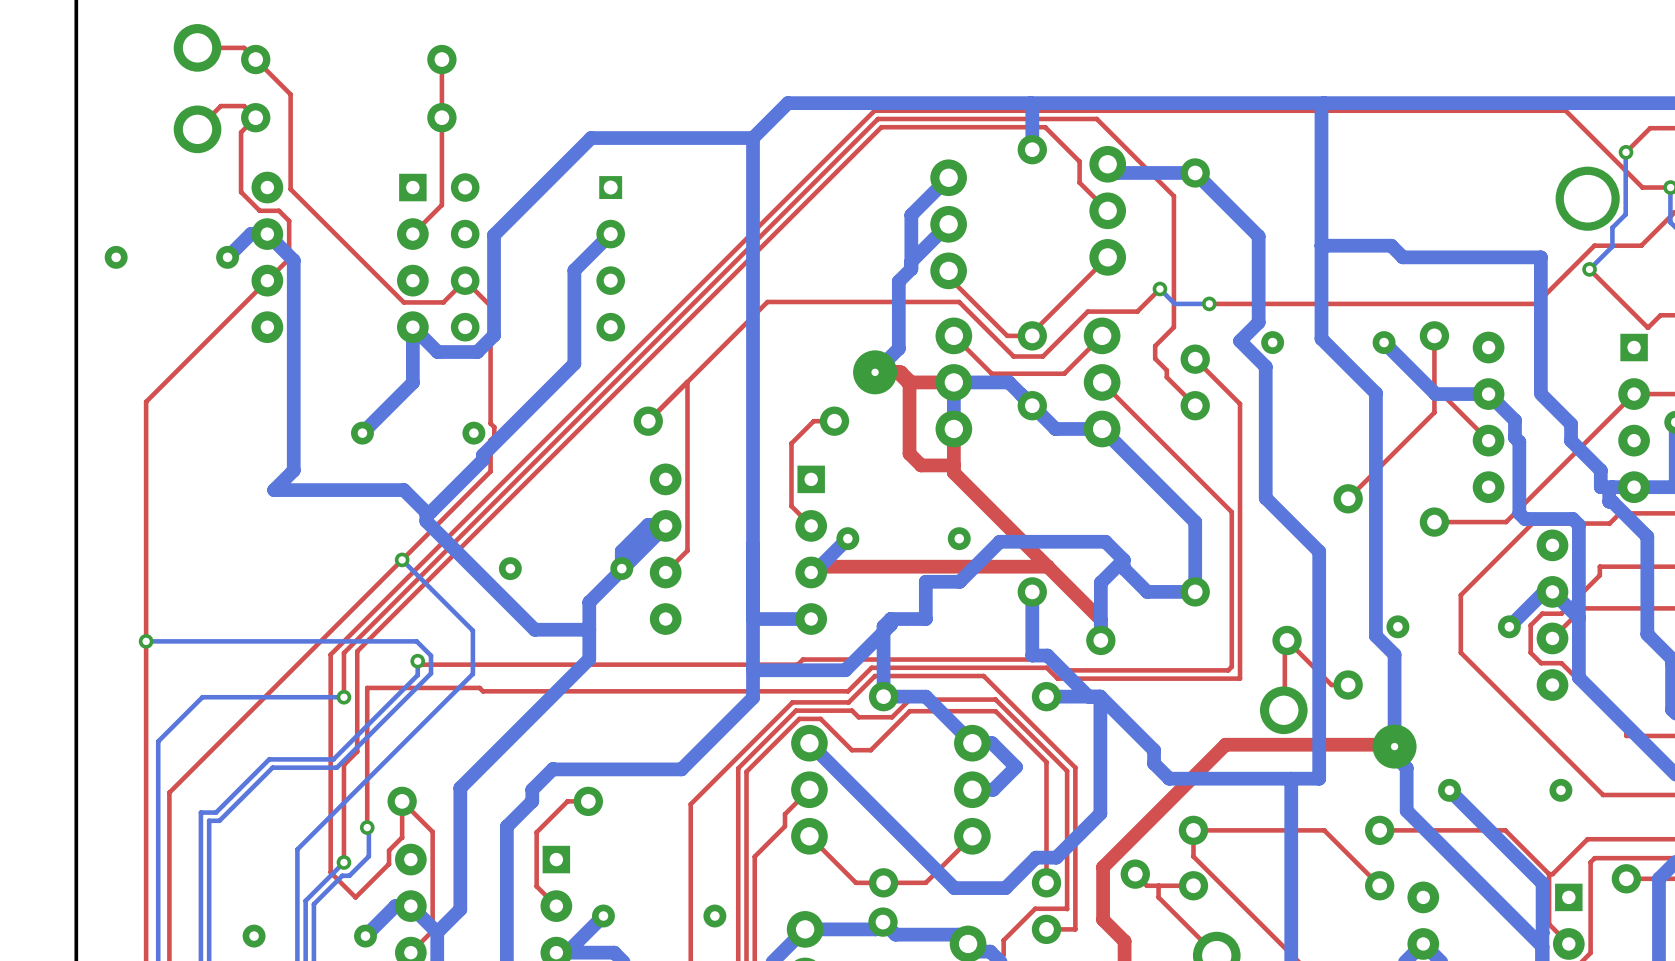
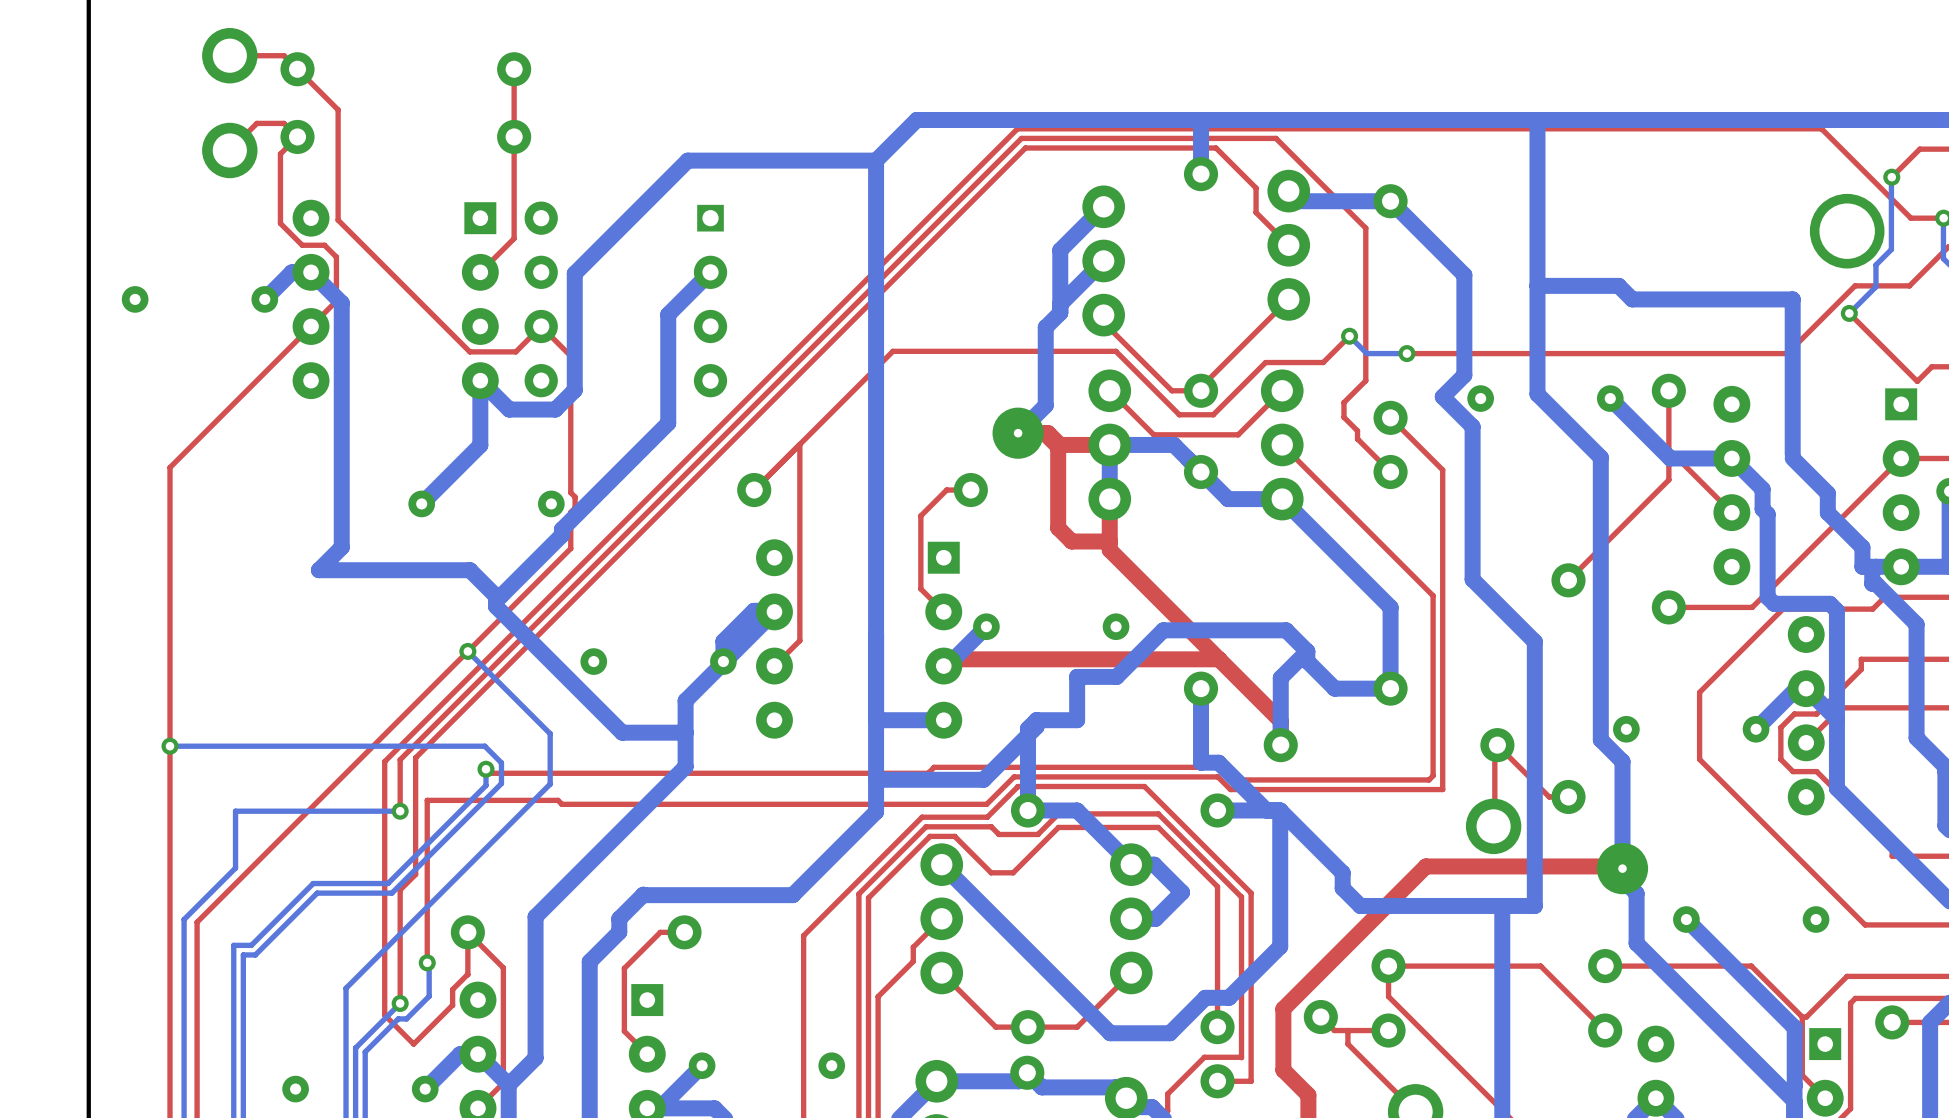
bottom track: (202, 697) (158, 741) (158, 790) -> (235, 811) (235, 868) (184, 919)

